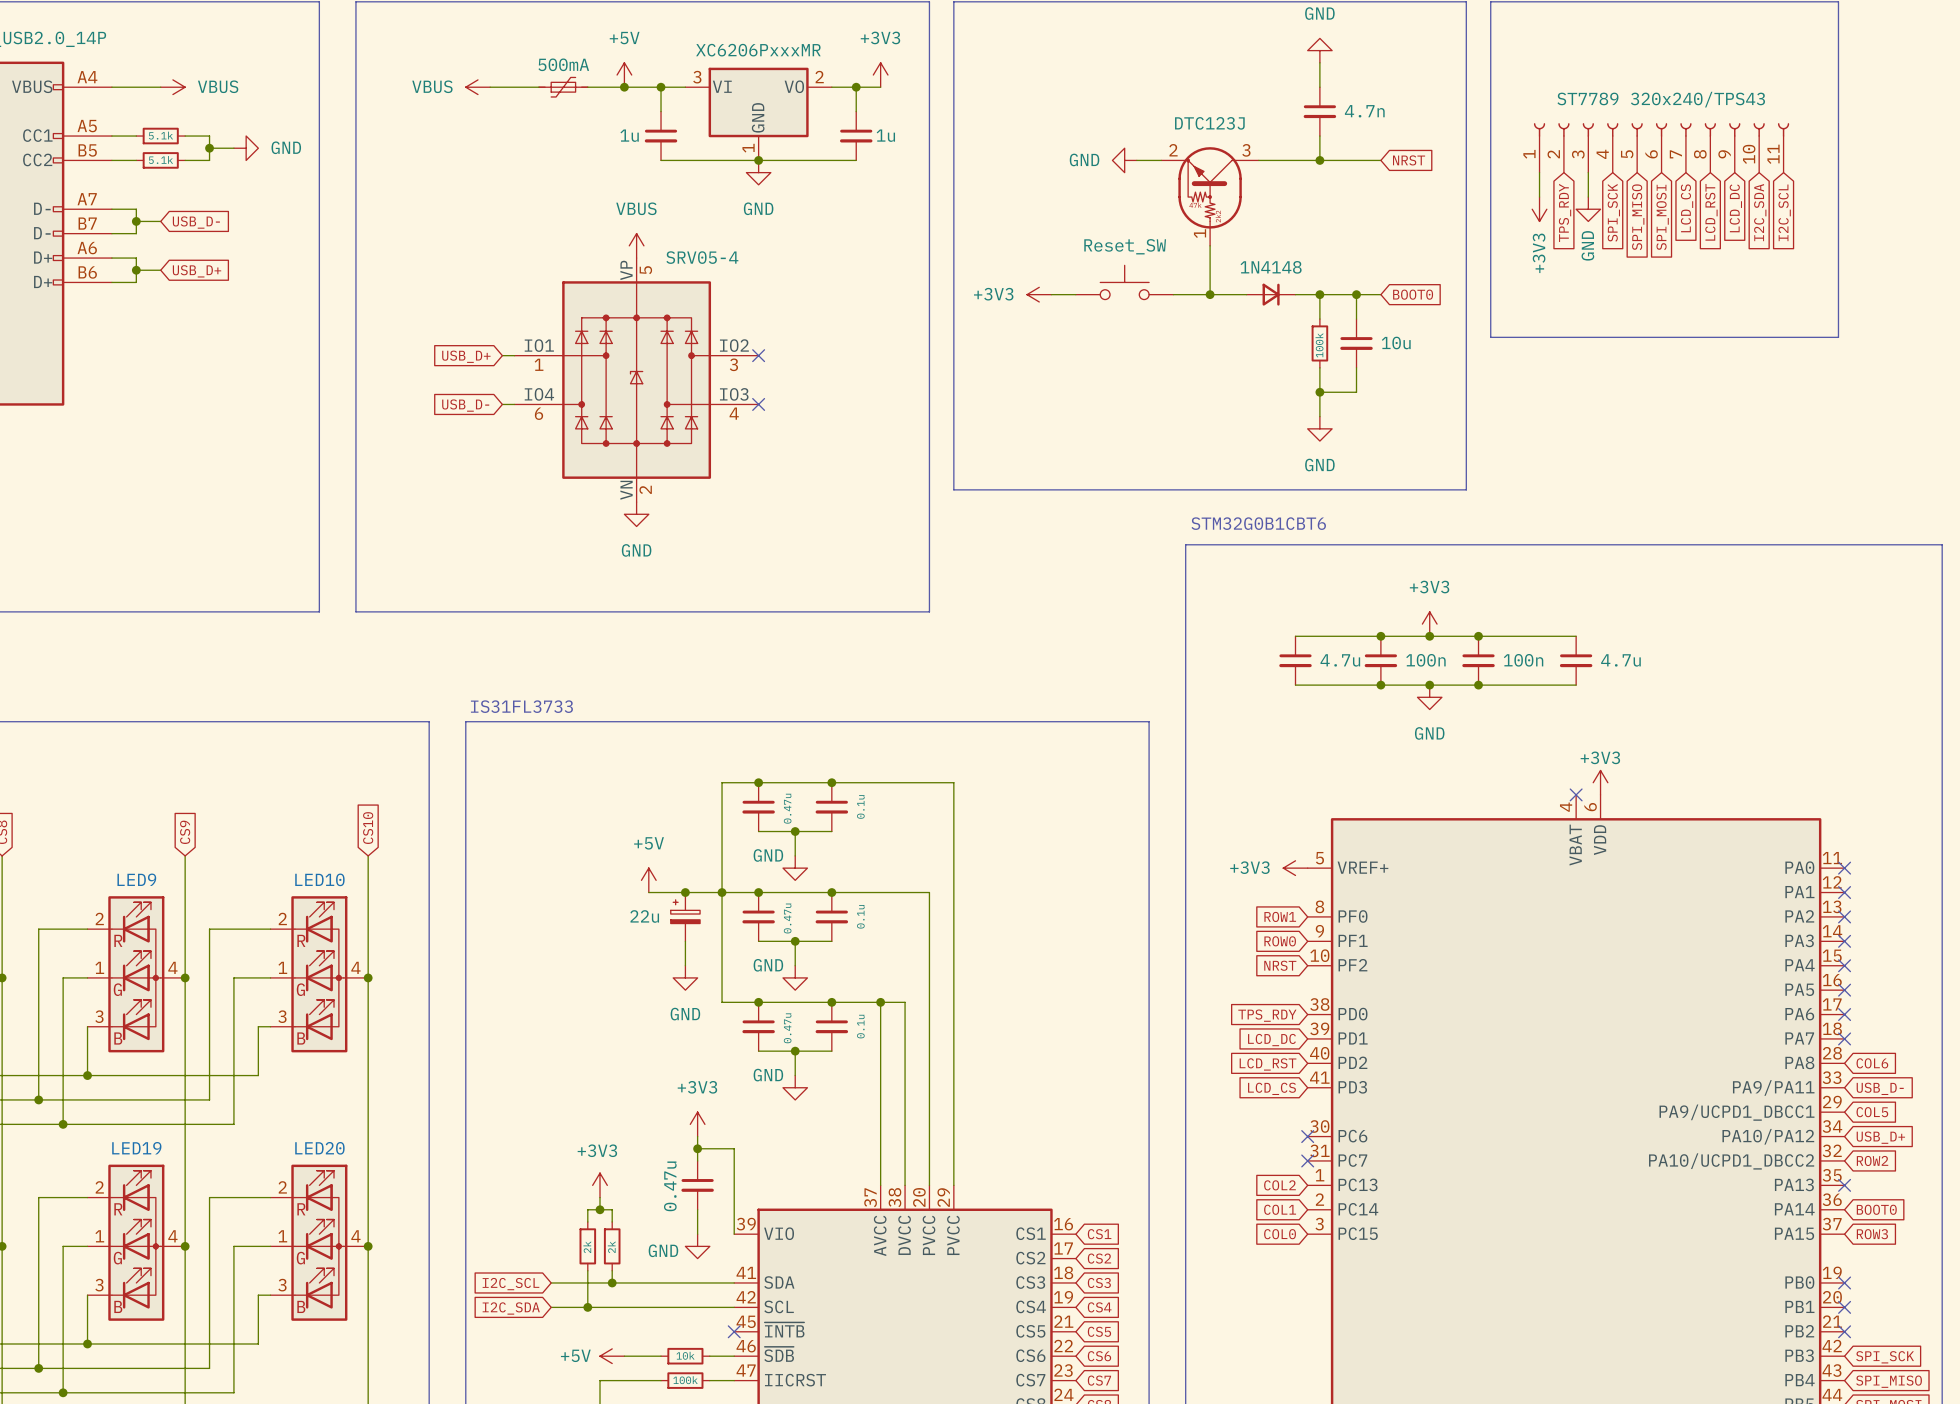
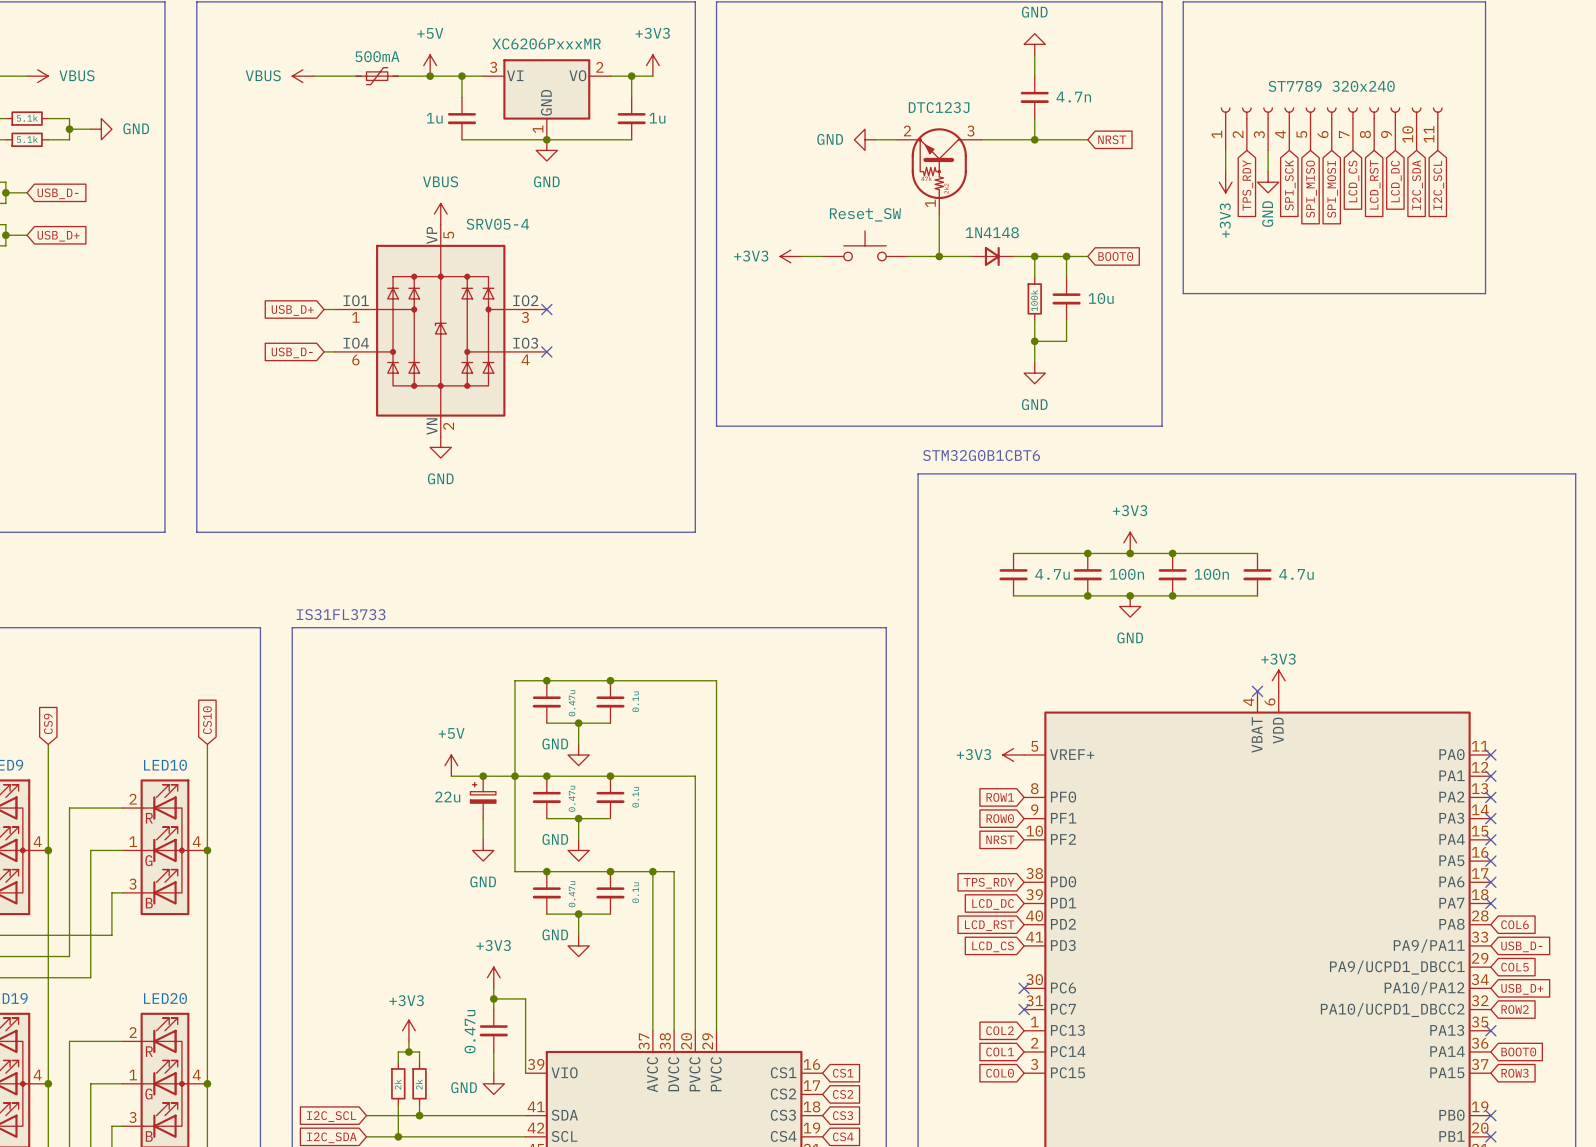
part value: ST7789 320x240/TPS43 (1661, 99) -> ST7789 320x240 (1331, 86)

